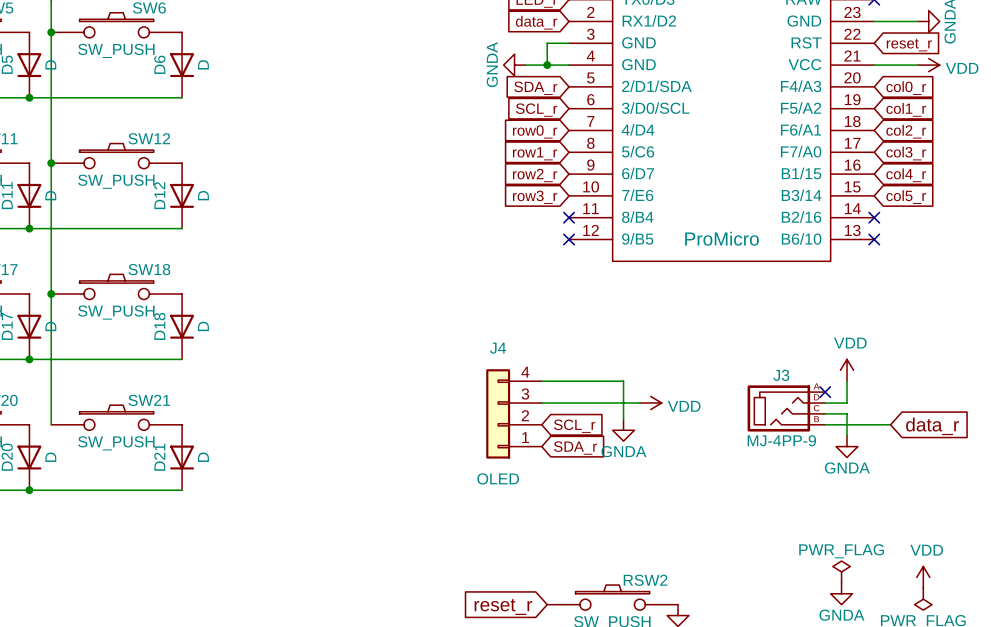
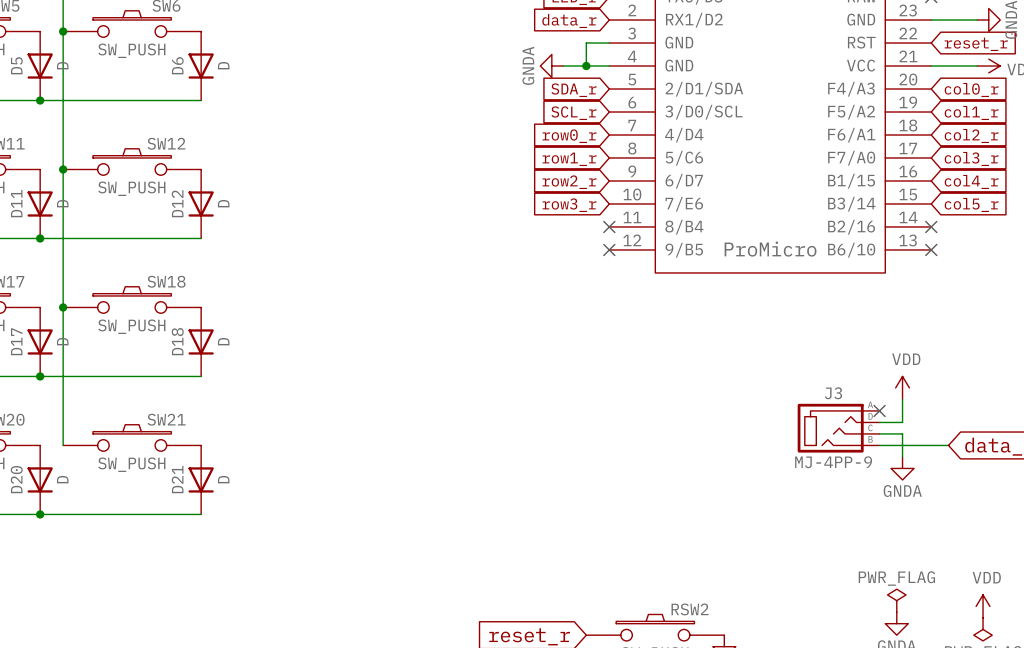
wire: (541, 381) (623, 381) (623, 419) -> none
wire: (541, 403) (639, 403) -> none
power symbol: VDD (650, 403) -> none
J4: OLED (513, 413) -> none
global label: SCL_r (574, 426) -> none
power symbol: GNDA (623, 430) -> none
global label: SDA_r (575, 448) -> none

